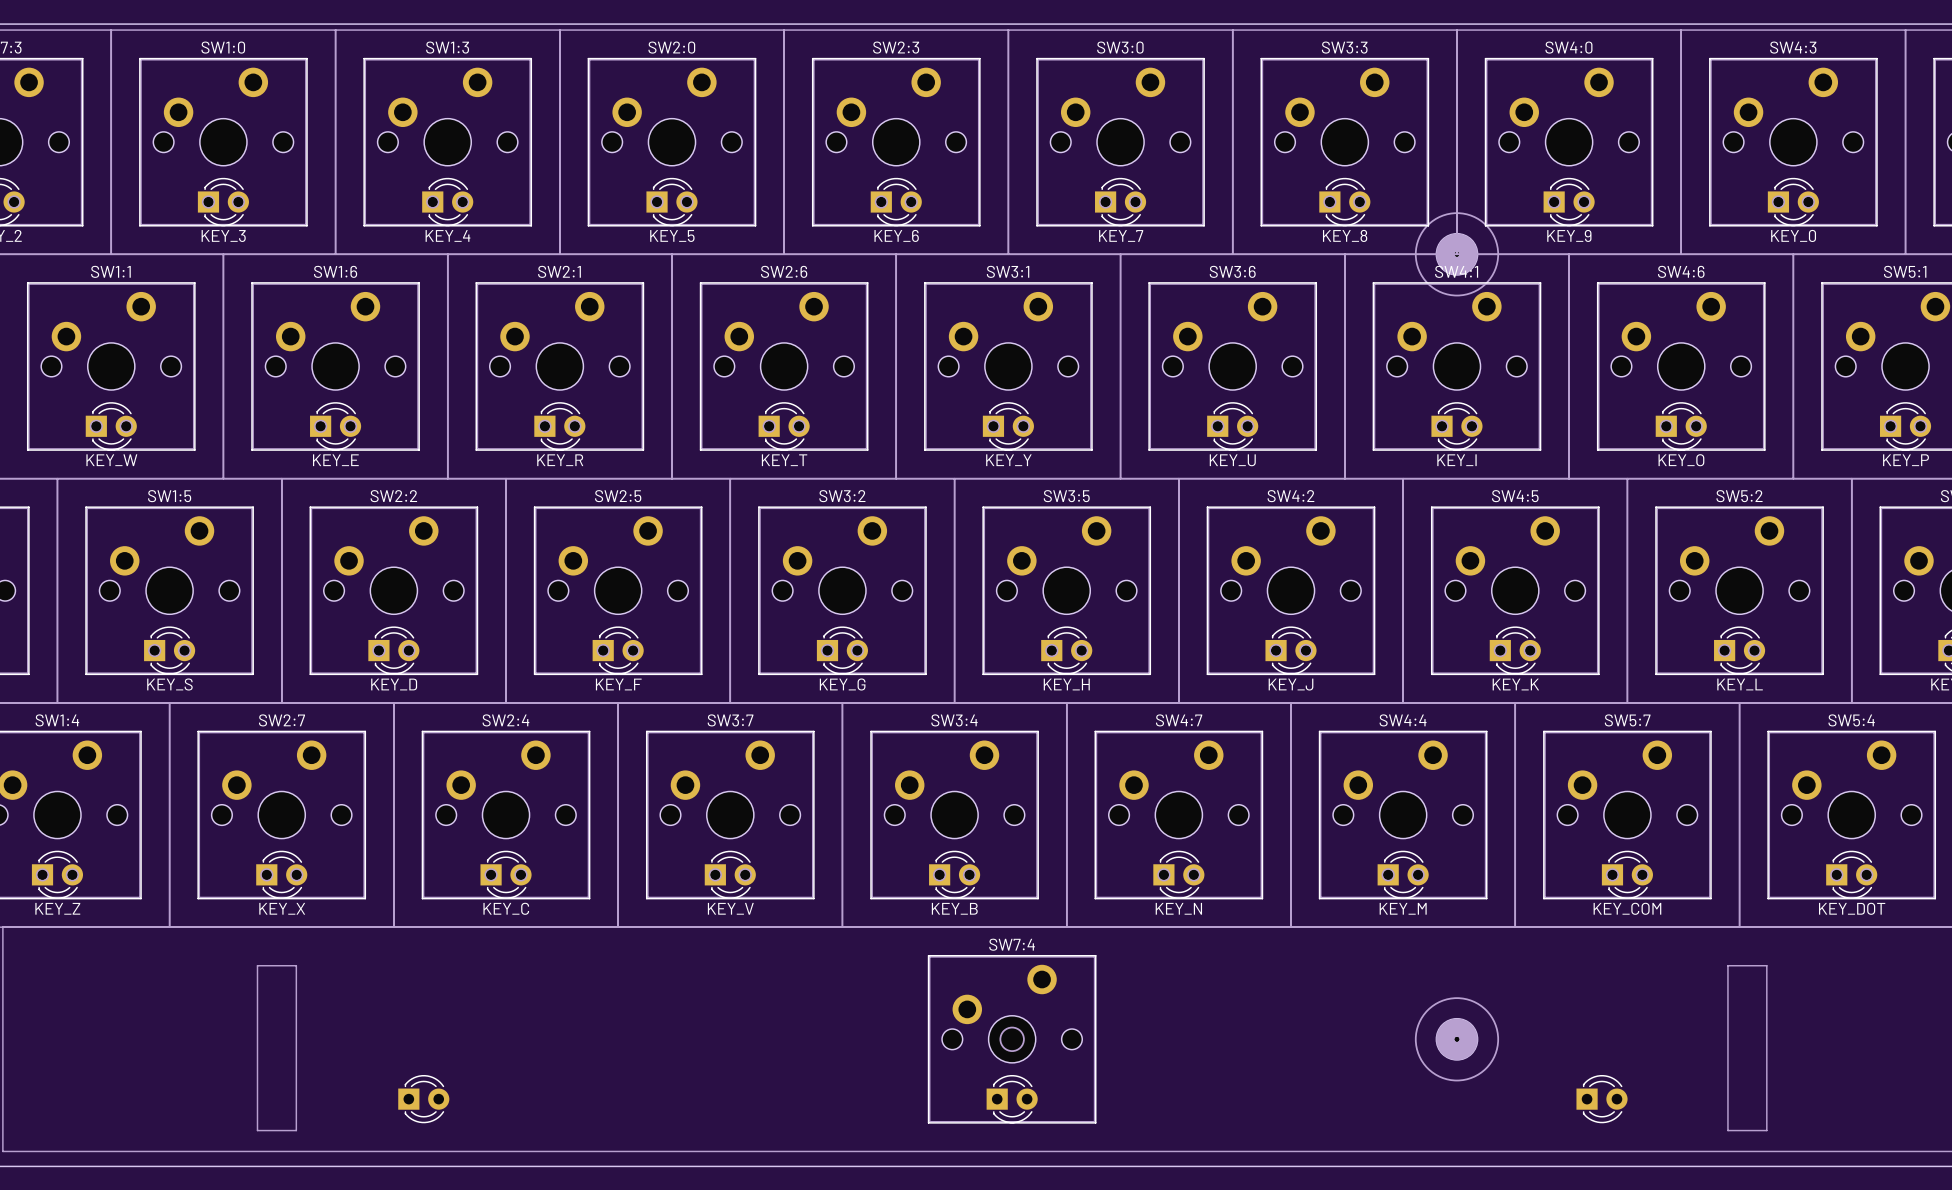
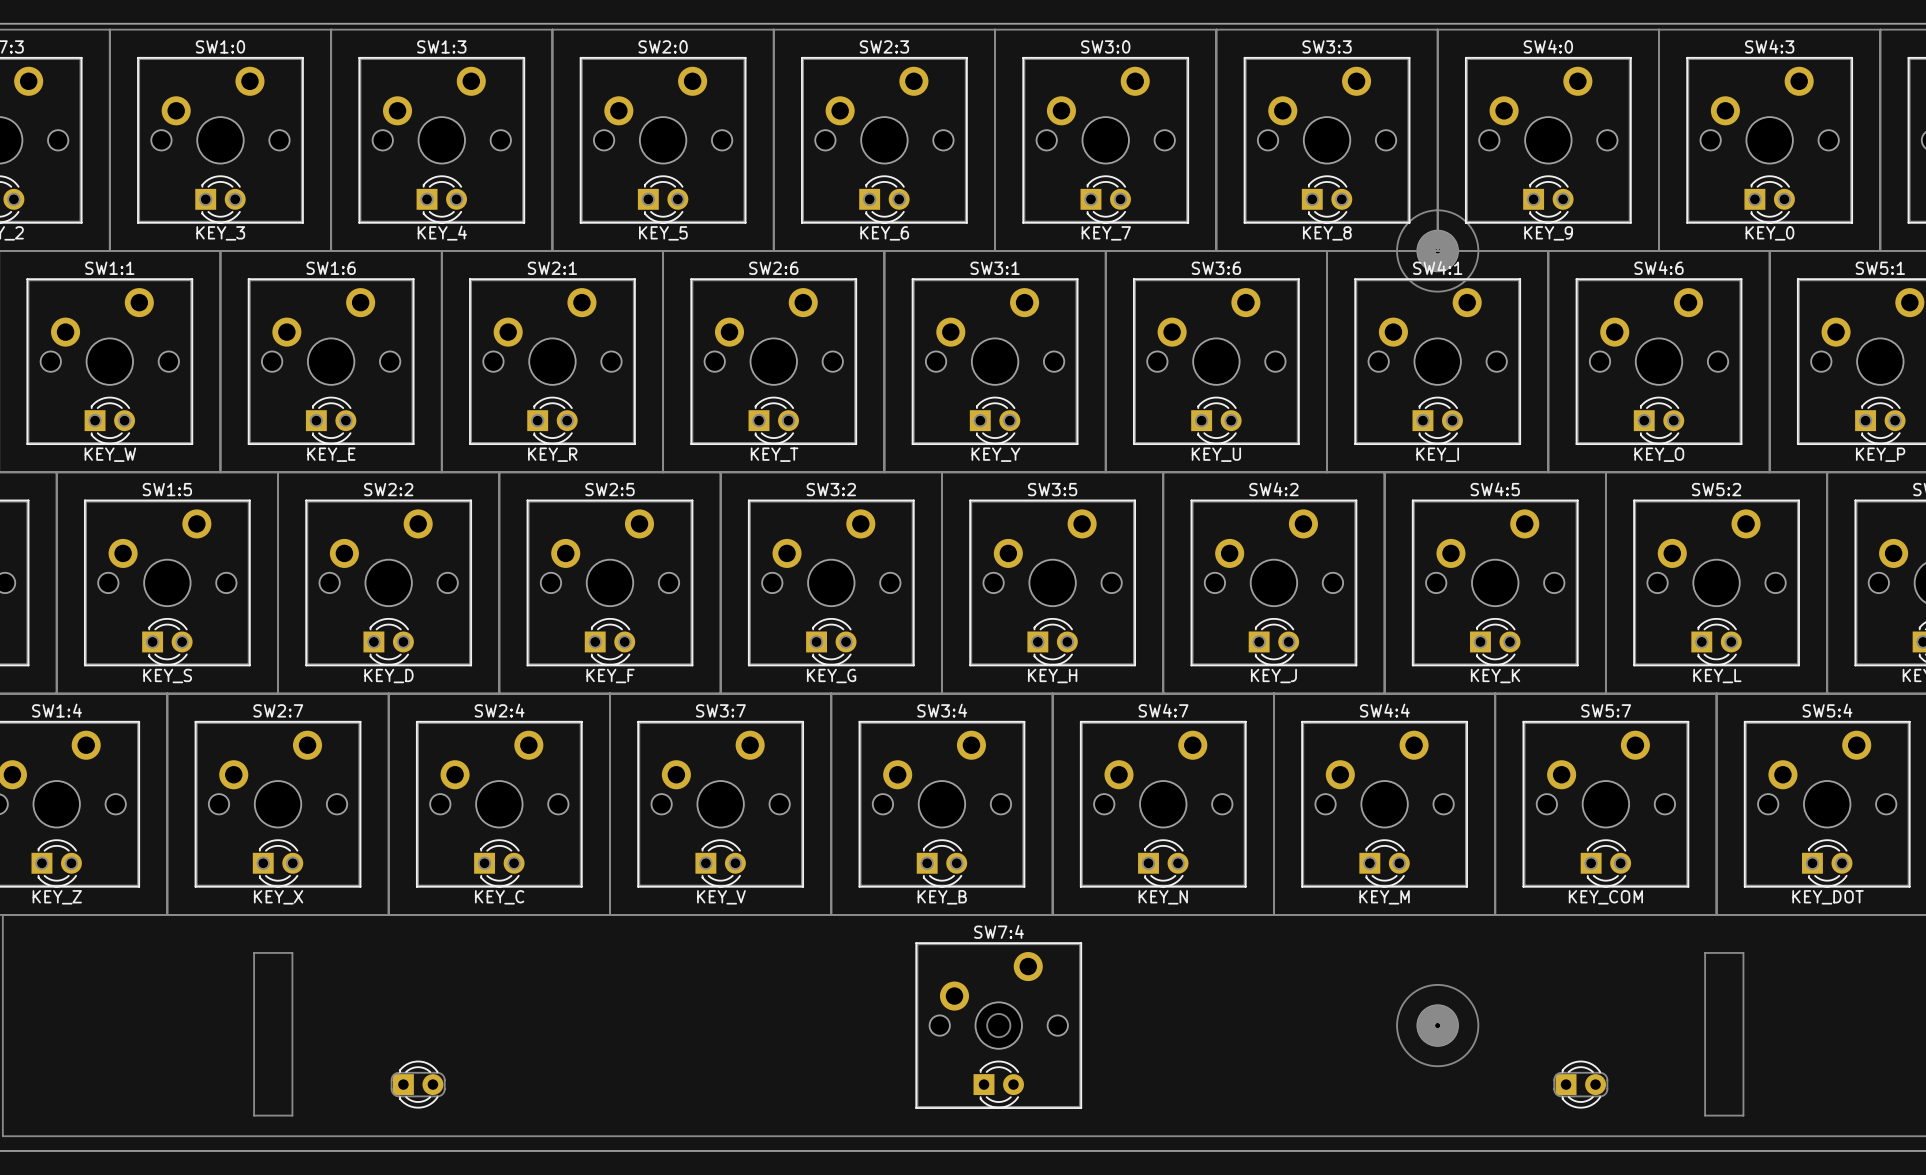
line: none -> (399, 1072) (440, 1073) (444, 1078) (444, 1091) (438, 1096) (396, 1095) (391, 1090) (391, 1079) (394, 1074) (399, 1072)
line: none -> (1561, 1072) (1602, 1073) (1607, 1078) (1606, 1091) (1600, 1096) (1558, 1095) (1554, 1090) (1554, 1079) (1557, 1074) (1561, 1072)

